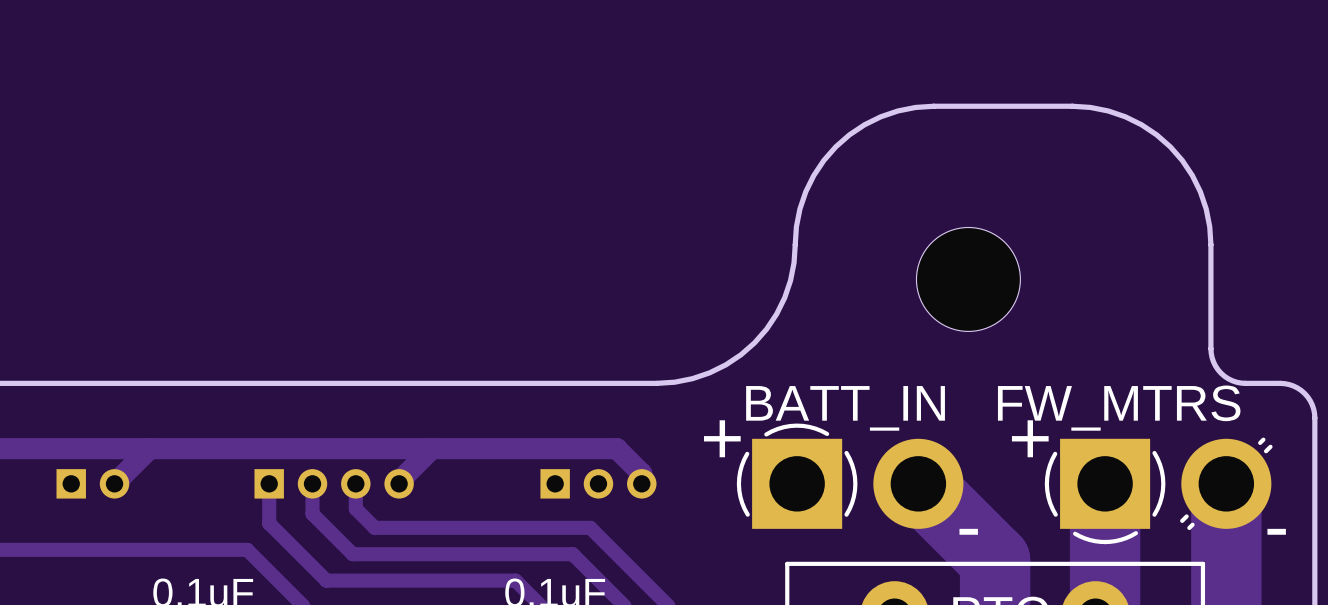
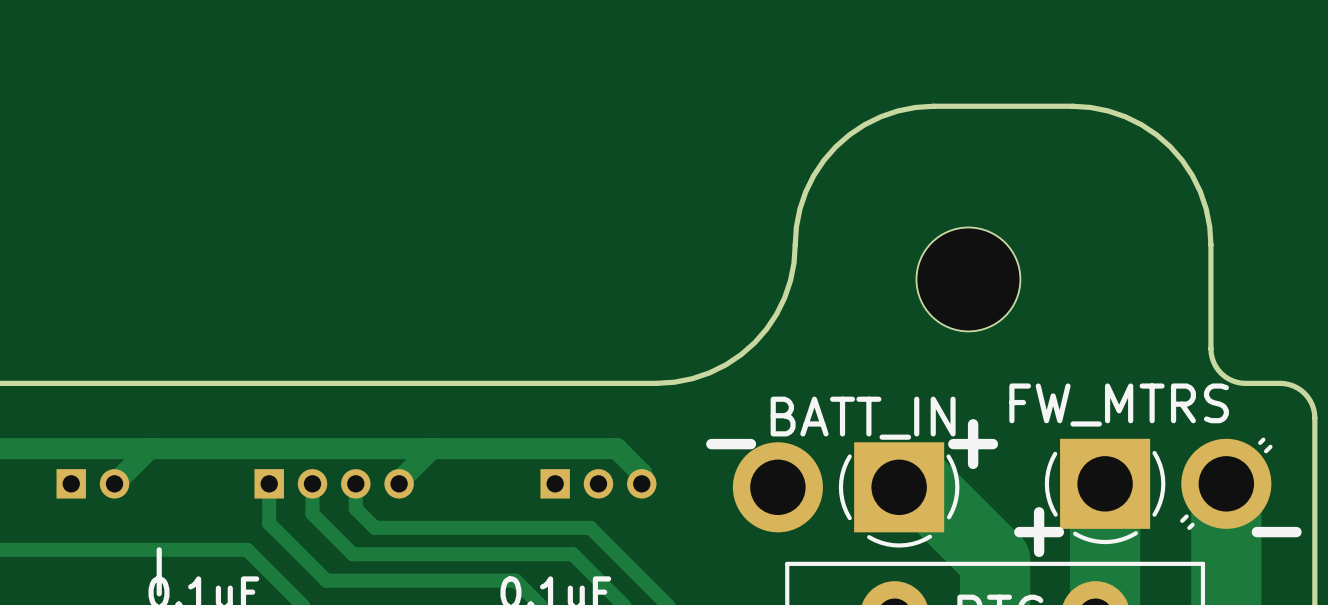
text: + (722, 438) -> none
text: none -> + (973, 444)
text: + (1030, 438) -> none
part rotation: 0° (850, 476) -> 180° (846, 494)
text: none -> + (1039, 532)
text position: - (968, 531) -> - (731, 444)
line: none -> (159, 549) (159, 593)

